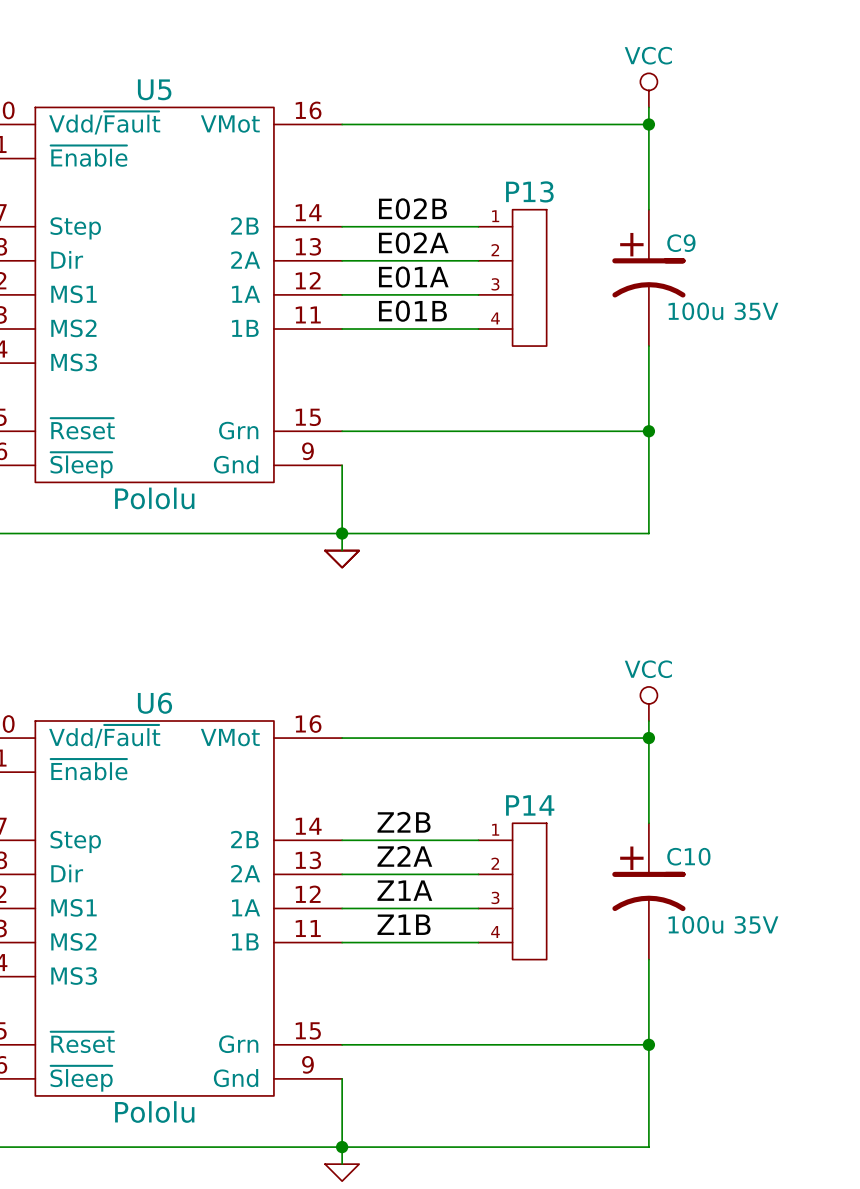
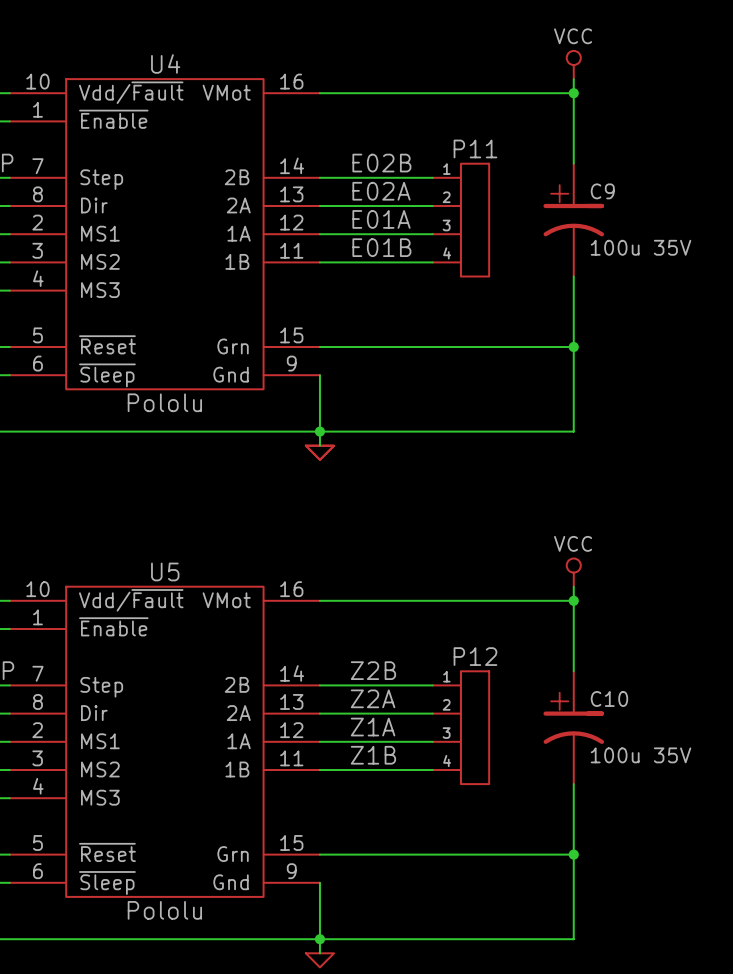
U5 name: U5 (154, 89) -> U4 (165, 63)
P13 name: P13 (529, 191) -> P11 (475, 148)
U6 name: U6 (154, 703) -> U5 (165, 571)
P14 name: P14 (530, 805) -> P12 (475, 656)

